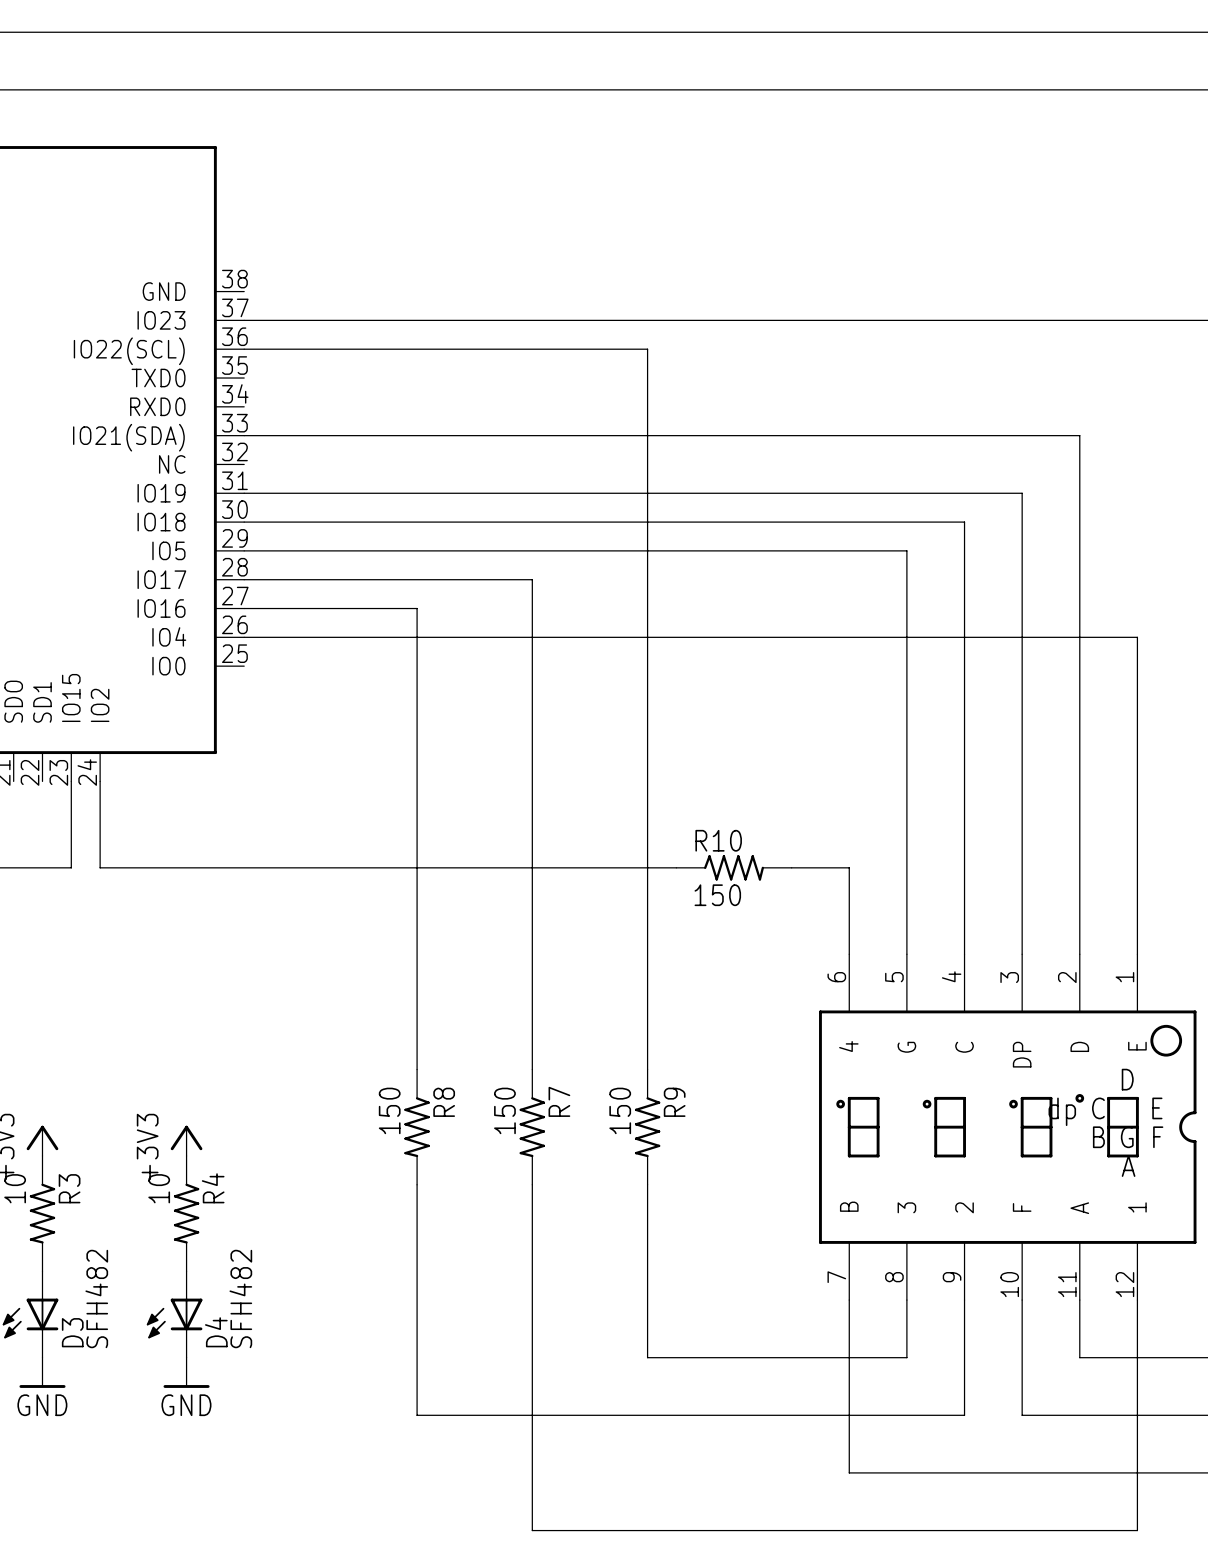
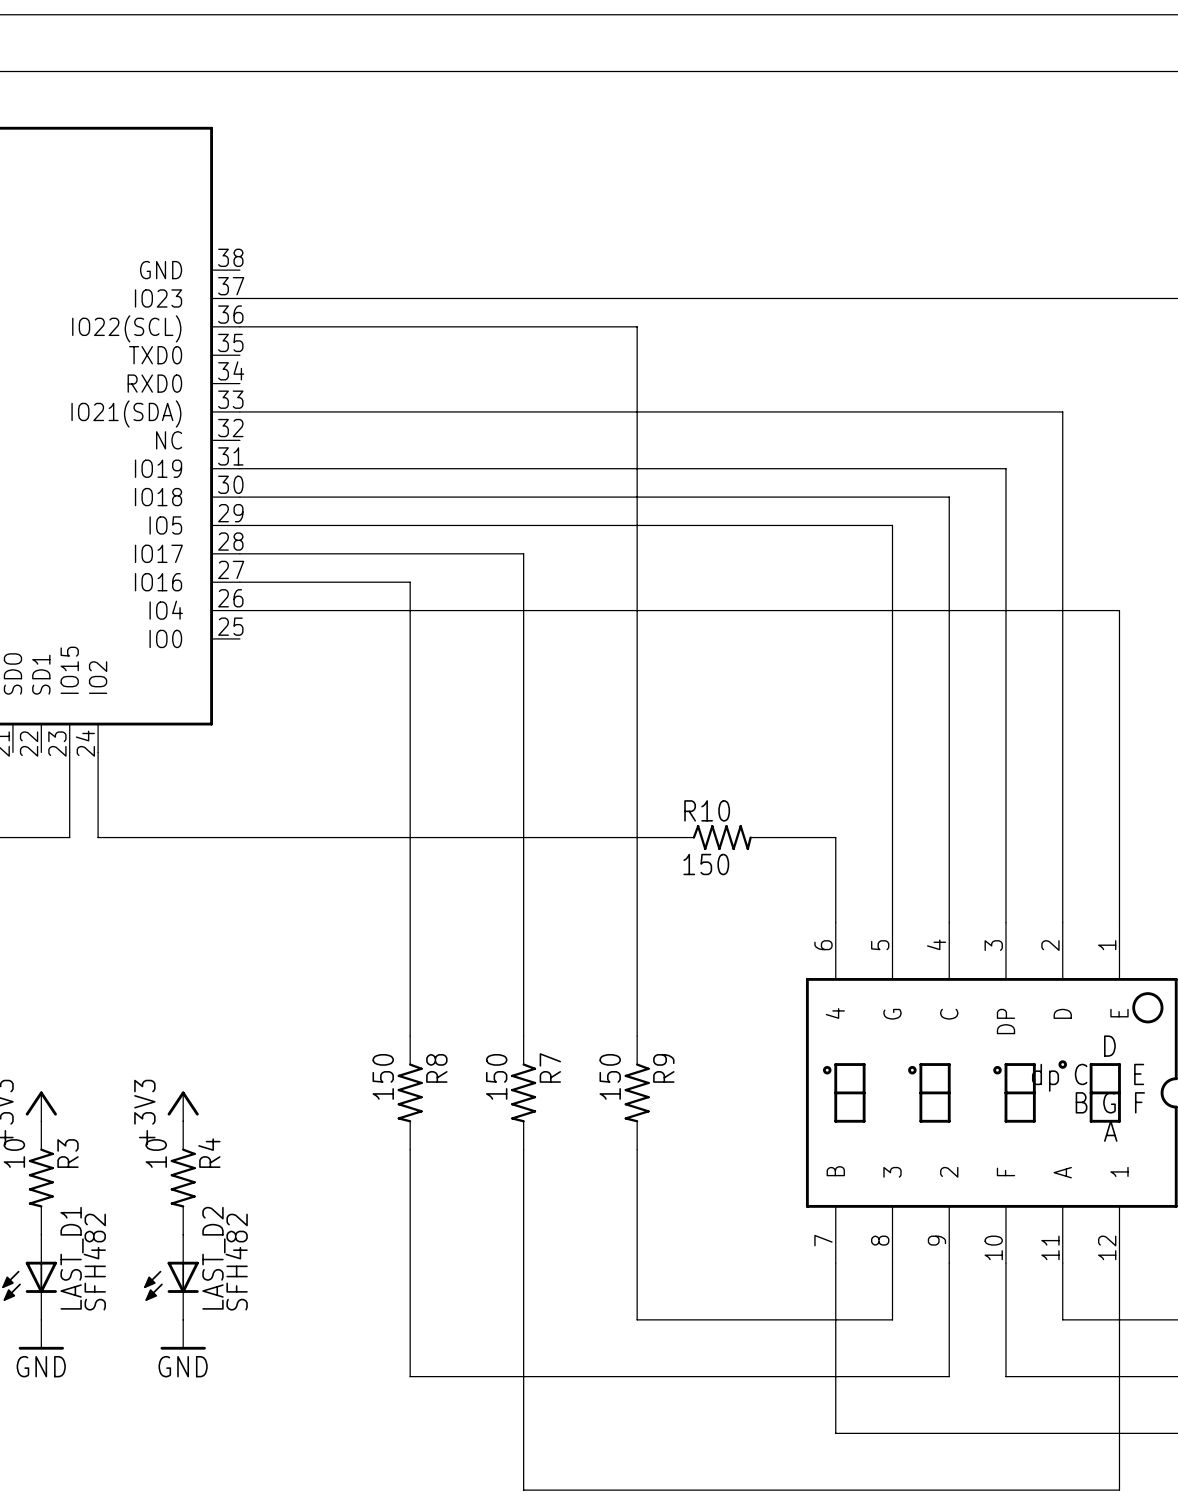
D3 name: D3 (72, 1332) -> LAST_D1 (72, 1258)
D4 name: D4 (216, 1332) -> LAST_D2 (213, 1258)

